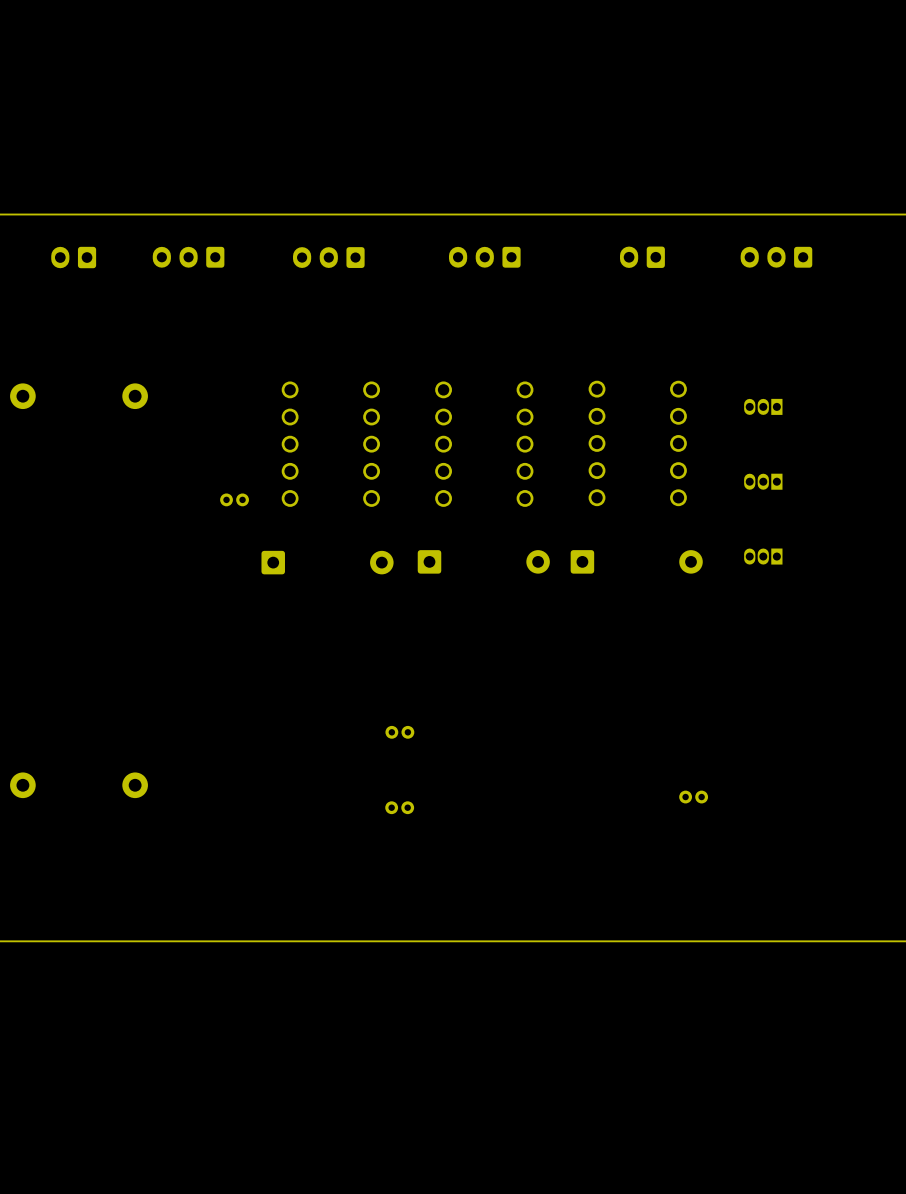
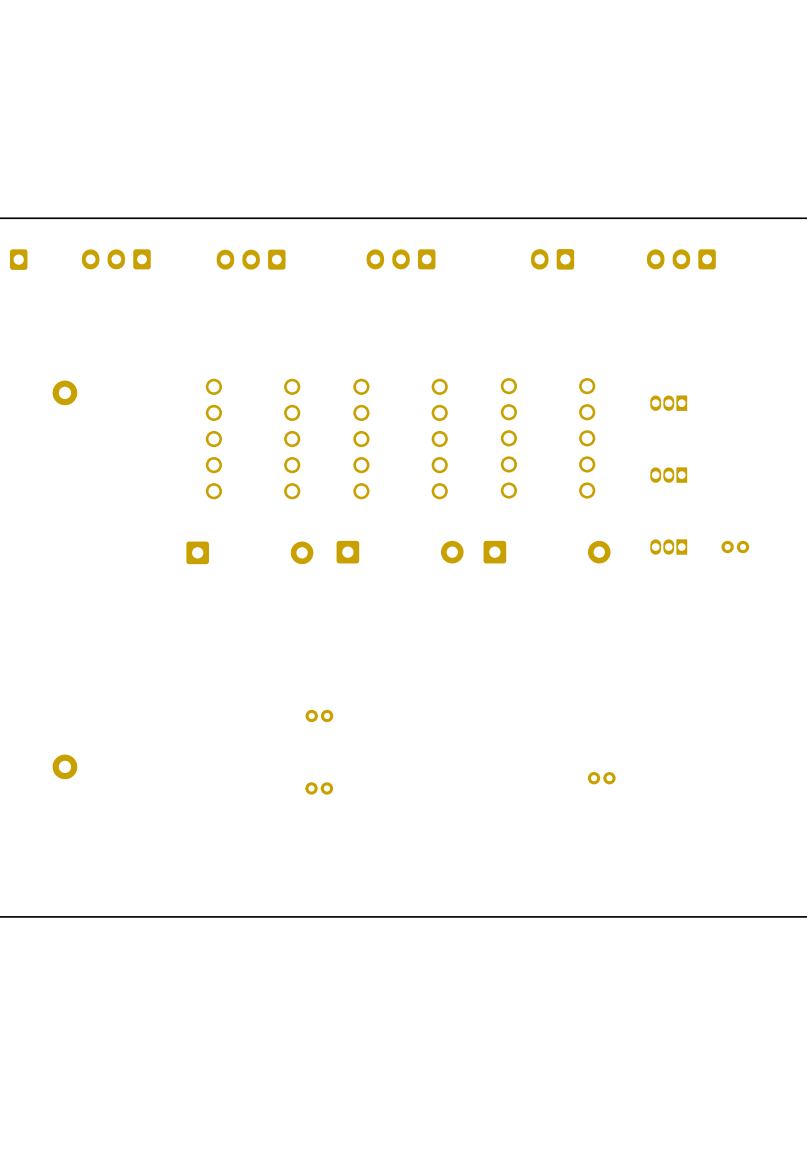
part: (234, 499) -> none
part: none -> (735, 547)

